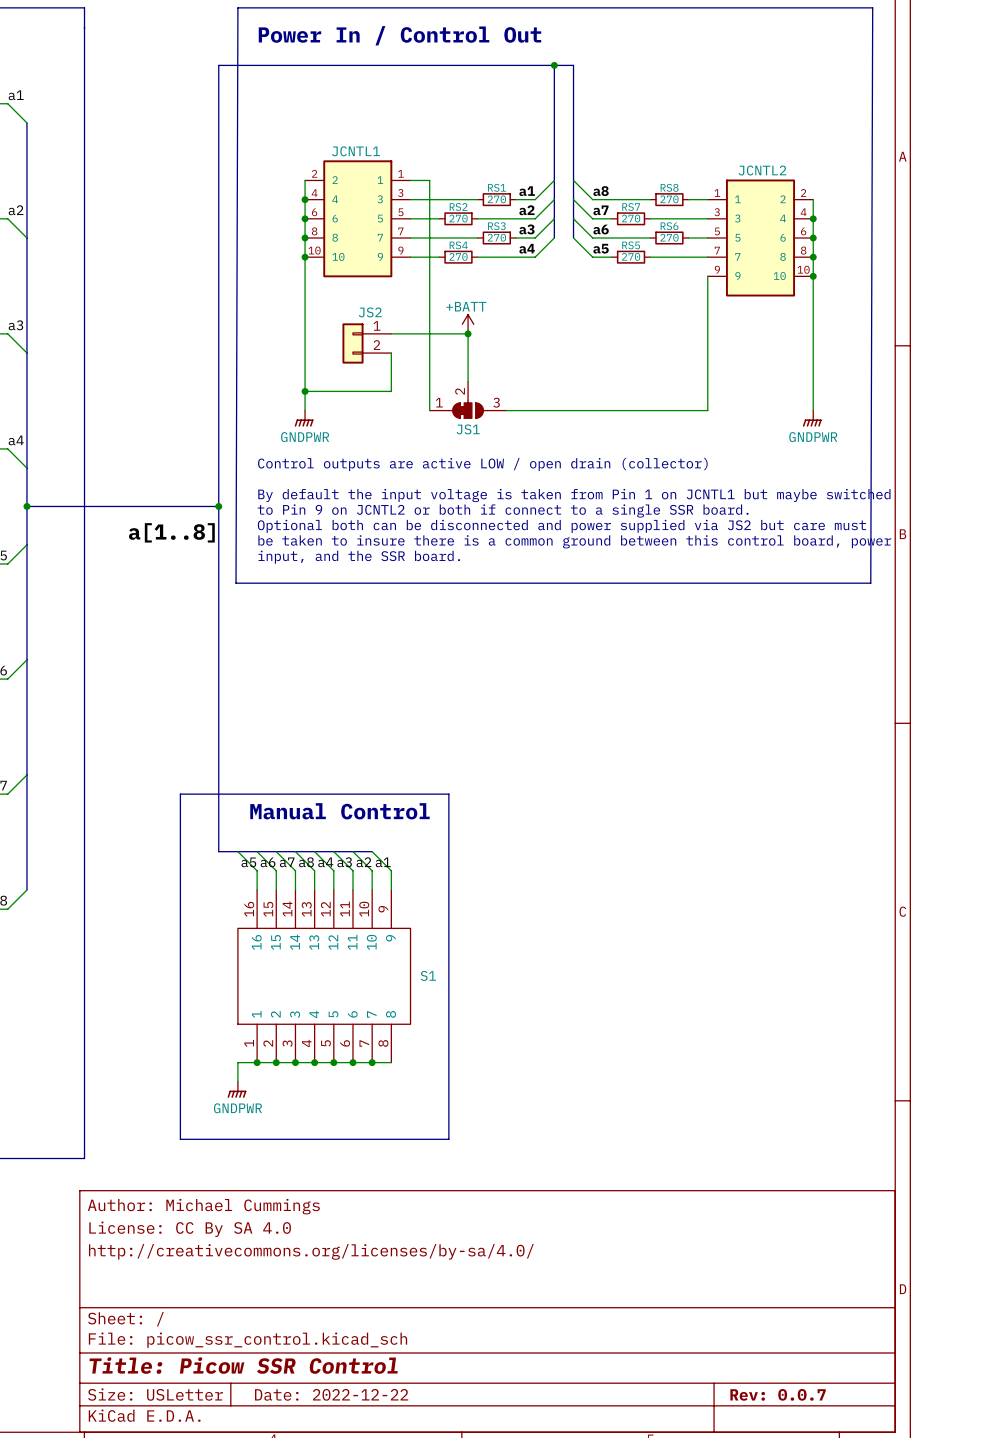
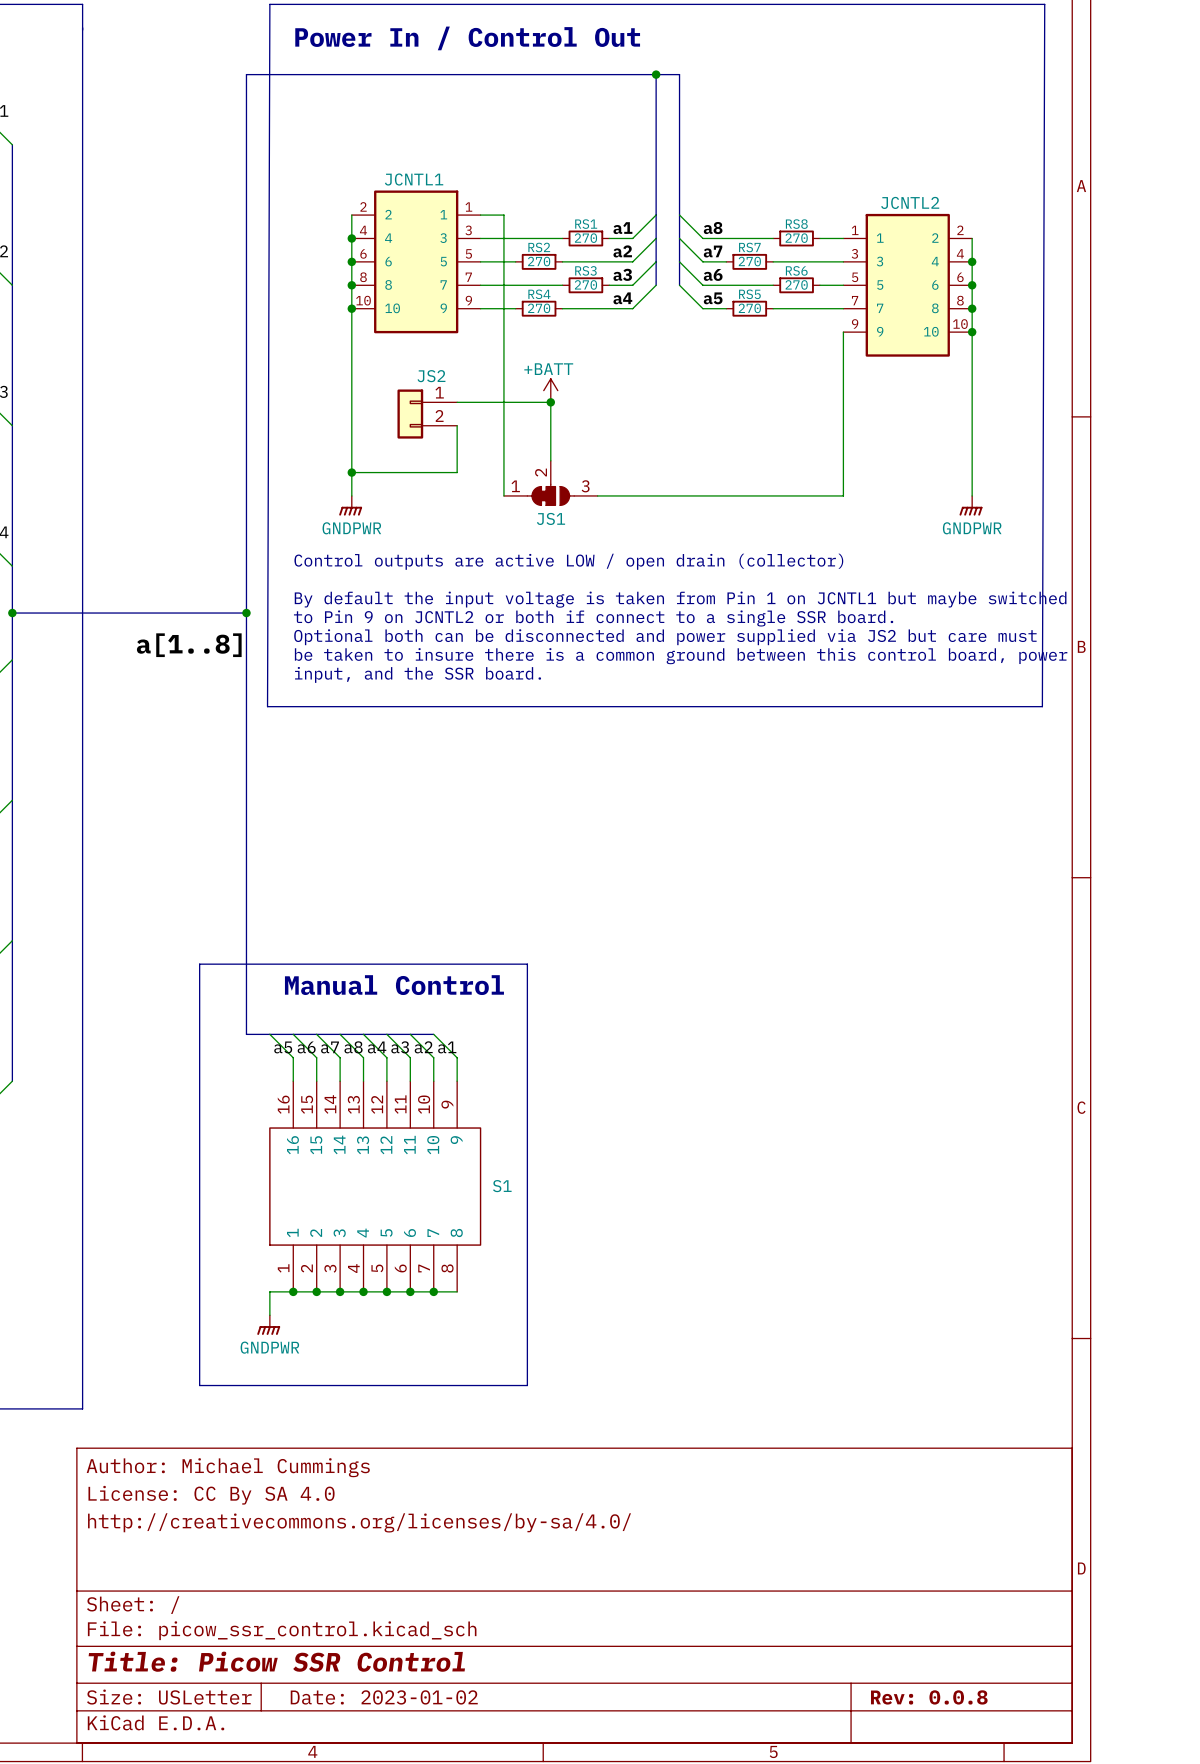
title block: Date: 2022-12-22 (331, 1394) -> Date: 2023-01-02 (384, 1697)
title block: Rev: 0.0.7 (778, 1394) -> Rev: 0.0.8 (929, 1697)

